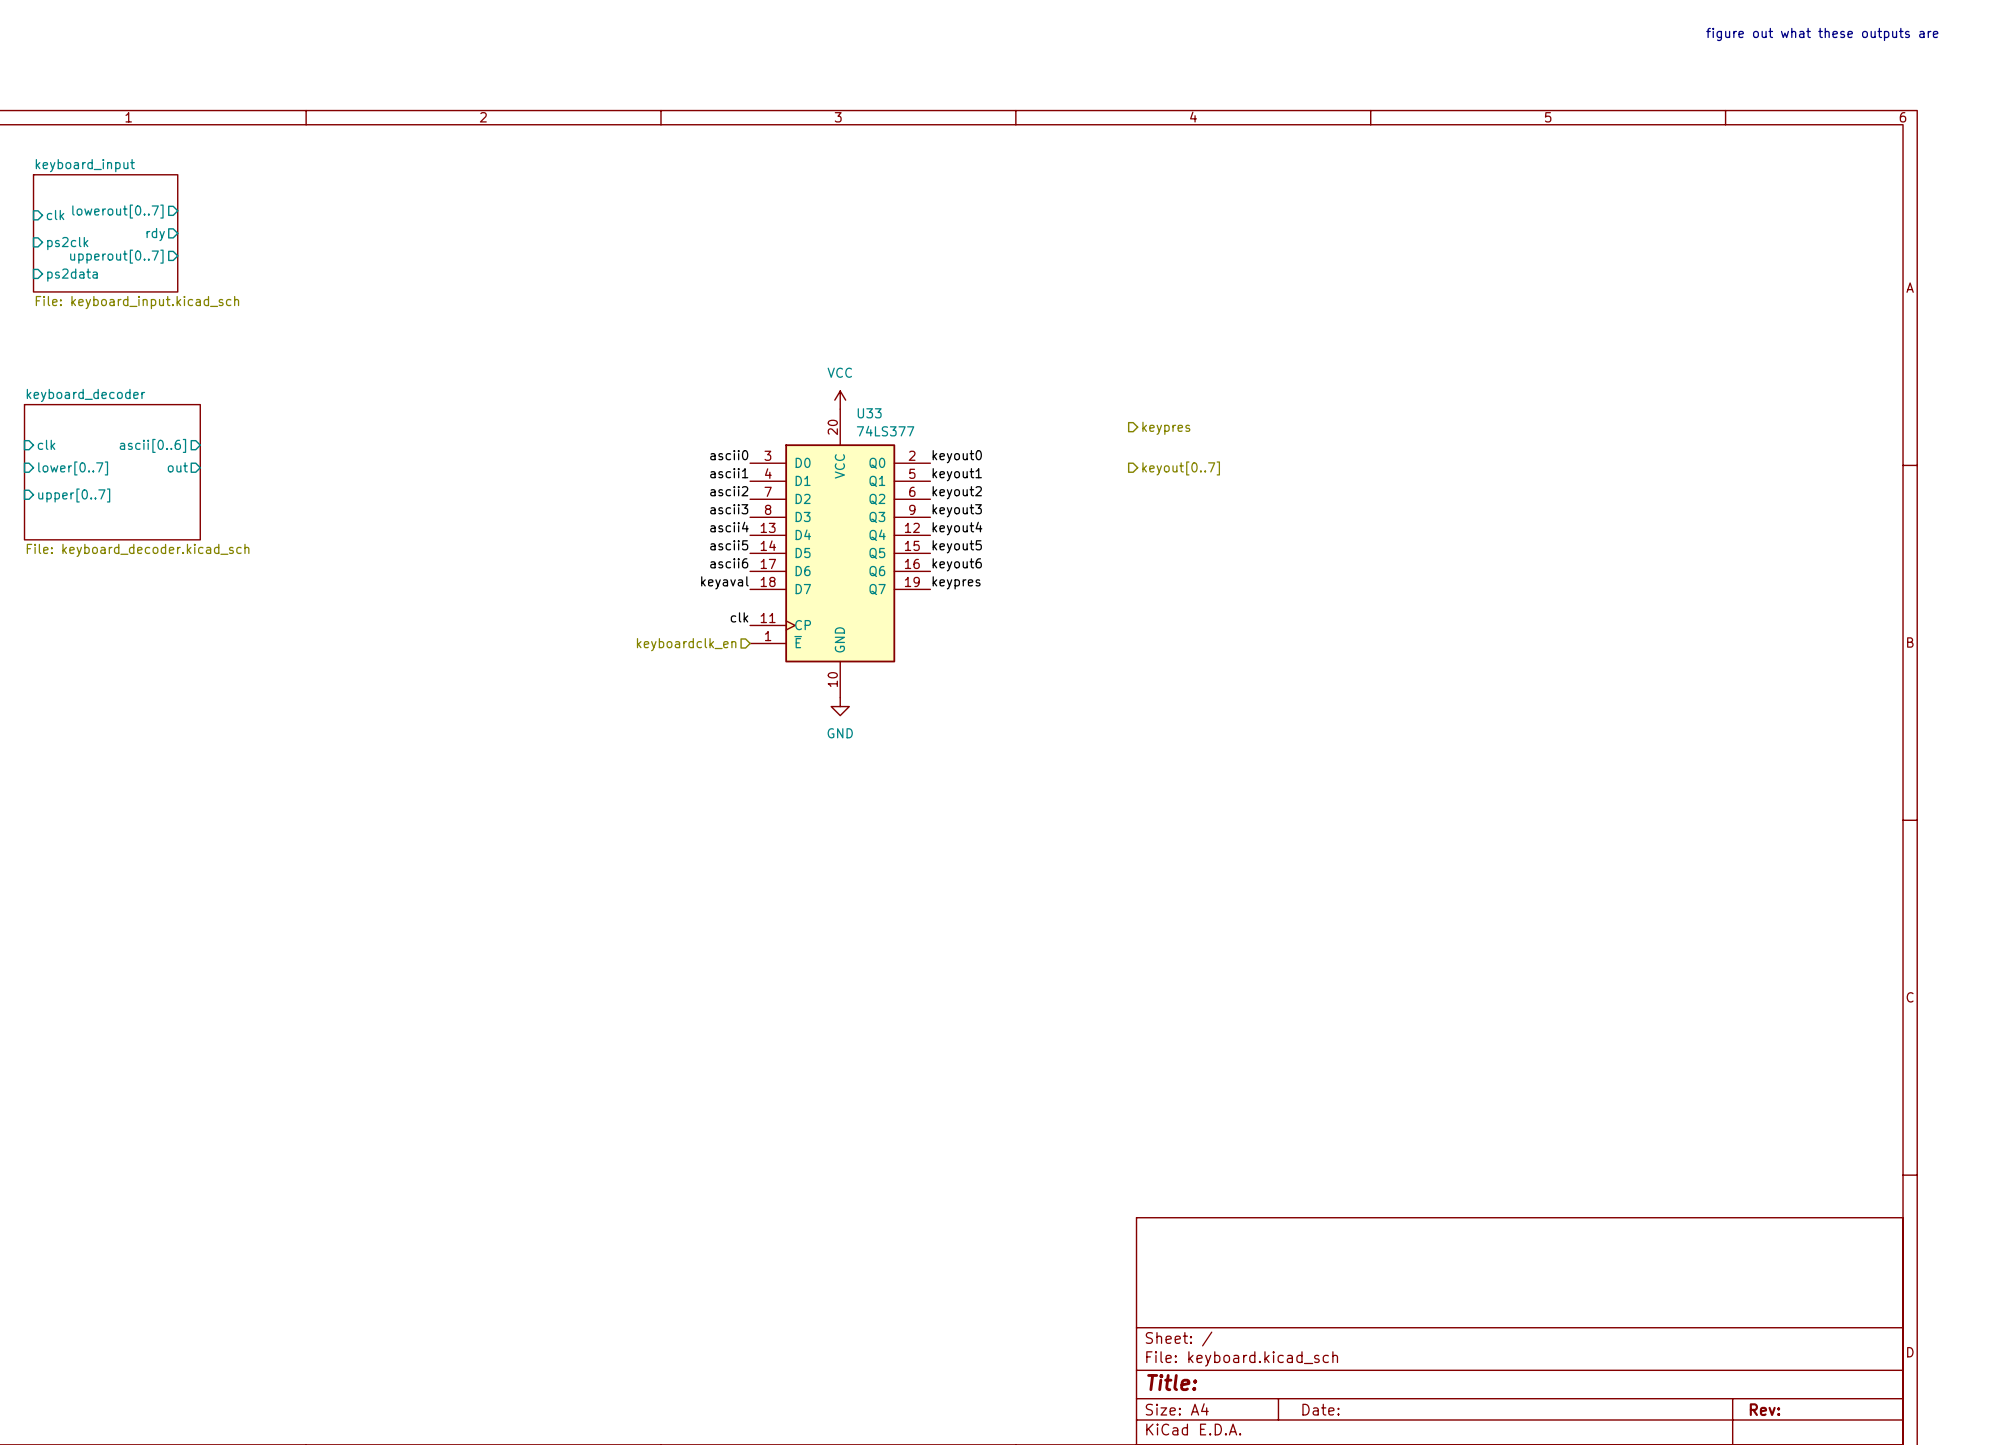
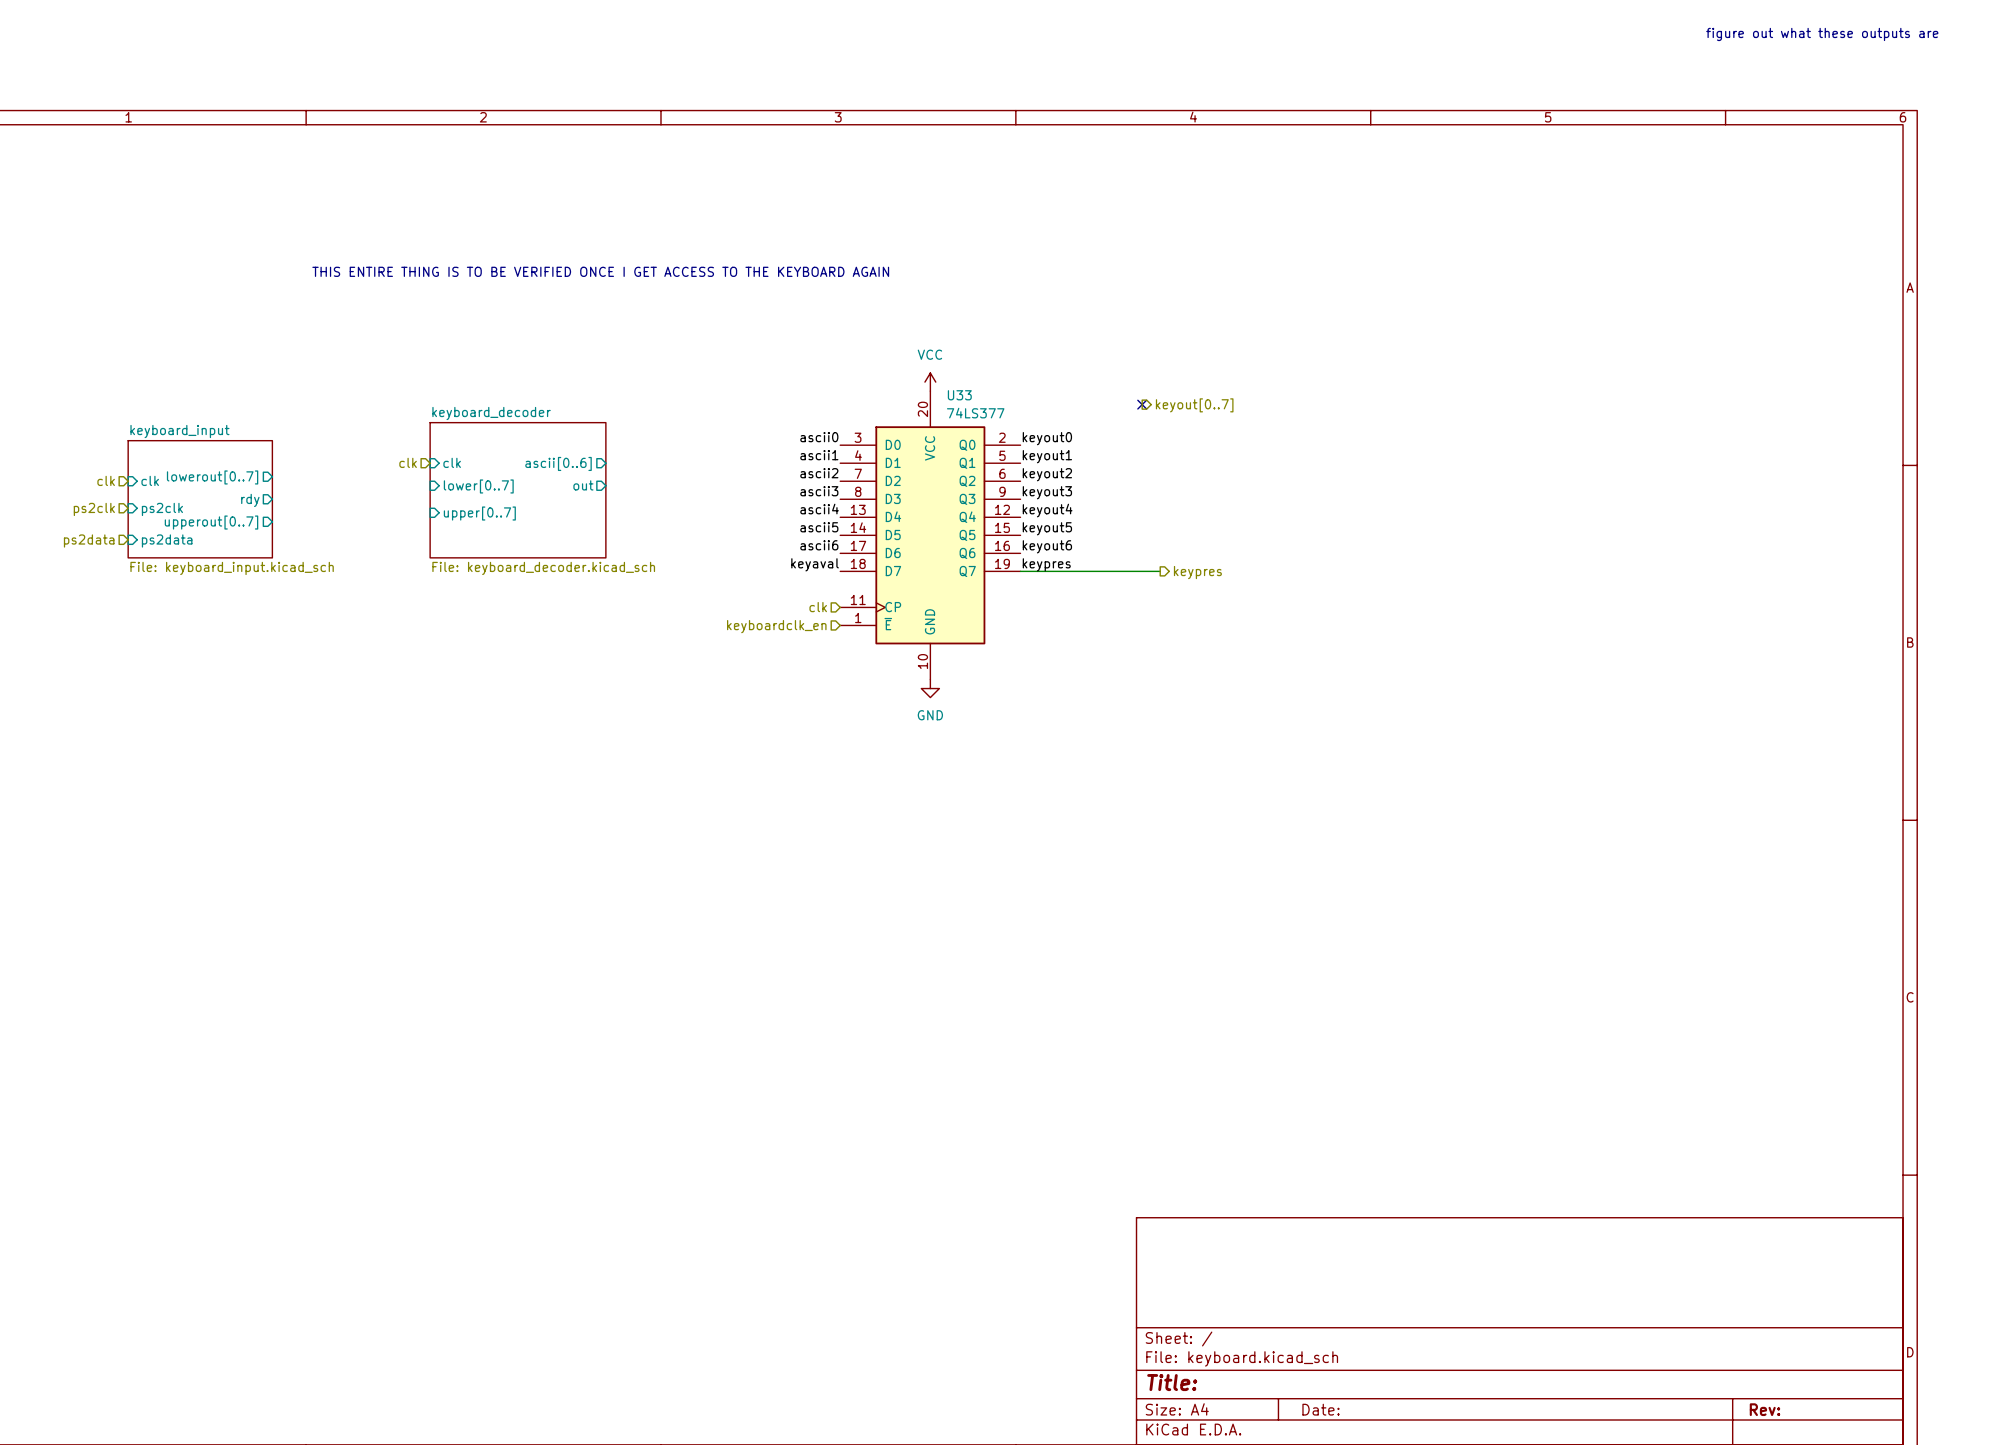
sheet pin: lowerout[0..7] (117, 211) -> none
sheet pin: clk (55, 215) -> none
sheet keyboard_input: File: keyboard_input.kicad_sch (105, 233) -> none
sheet pin: rdy (155, 234) -> none
sheet pin: ps2clk (67, 243) -> none
sheet pin: upperout[0..7] (116, 256) -> none
text: none -> THIS ENTIRE THING IS TO BE VERIFIED ONCE I GET ACCESS TO THE KEYBOARD AGAIN (600, 271)
sheet pin: ps2data (72, 275) -> none
power symbol position: VCC (840, 400) -> VCC (930, 382)
no-connect mark: none -> (1142, 404)
hierarchical label position: keypres (1166, 428) -> keypres (1197, 572)
sheet pin position: clk (46, 444) -> clk (150, 480)
sheet pin: ascii[0..6] (152, 445) -> none
label position: ascii0 (729, 455) -> ascii0 (819, 437)
label position: keyout0 (957, 456) -> keyout0 (1047, 438)
hierarchical label: none -> clk (408, 462)
sheet pin: none -> clk (452, 462)
sheet pin: none -> ascii[0..6] (558, 463)
sheet pin: out (177, 467) -> none
sheet pin: lower[0..7] (73, 468) -> none
hierarchical label position: keyout[0..7] (1181, 468) -> keyout[0..7] (1194, 405)
sheet keyboard_decoder: File: keyboard_decoder.kicad_sch (112, 472) -> none
label position: ascii1 (729, 473) -> ascii1 (819, 455)
label position: keyout1 (957, 474) -> keyout1 (1047, 456)
sheet pin: none -> lowerout[0..7] (212, 477)
hierarchical label: none -> clk (106, 480)
sheet pin: none -> out (583, 485)
sheet pin: none -> lower[0..7] (478, 486)
sheet keyboard_decoder: none -> File: keyboard_decoder.kicad_sch (518, 490)
label position: ascii2 (729, 491) -> ascii2 (819, 473)
label position: keyout2 (957, 492) -> keyout2 (1047, 474)
sheet pin: upper[0..7] (74, 495) -> none
sheet keyboard_input: none -> File: keyboard_input.kicad_sch (200, 499)
sheet pin: none -> rdy (250, 500)
hierarchical label: none -> ps2clk (94, 509)
sheet pin: none -> ps2clk (162, 509)
label position: ascii3 (729, 509) -> ascii3 (819, 491)
label position: keyout3 (957, 510) -> keyout3 (1047, 492)
sheet pin: none -> upper[0..7] (479, 513)
sheet pin: none -> upperout[0..7] (211, 522)
label position: ascii4 (729, 527) -> ascii4 (819, 509)
label position: keyout4 (957, 528) -> keyout4 (1047, 510)
hierarchical label: none -> ps2data (89, 540)
sheet pin: none -> ps2data (167, 540)
label position: ascii5 (729, 545) -> ascii5 (819, 527)
label position: keyout5 (957, 546) -> keyout5 (1047, 528)
U33 position: (840, 553) -> (930, 535)
label position: ascii6 (729, 563) -> ascii6 (819, 545)
label position: keyout6 (957, 564) -> keyout6 (1047, 546)
wire: none -> (1020, 571) (1160, 571)
label position: keyaval (724, 582) -> keyaval (815, 564)
label position: keypres (956, 582) -> keypres (1046, 564)
hierarchical label: none -> clk (818, 607)
label: clk (739, 617) -> none
hierarchical label position: keyboardclk_en (686, 644) -> keyboardclk_en (776, 626)
power symbol position: GND (840, 706) -> GND (930, 688)

